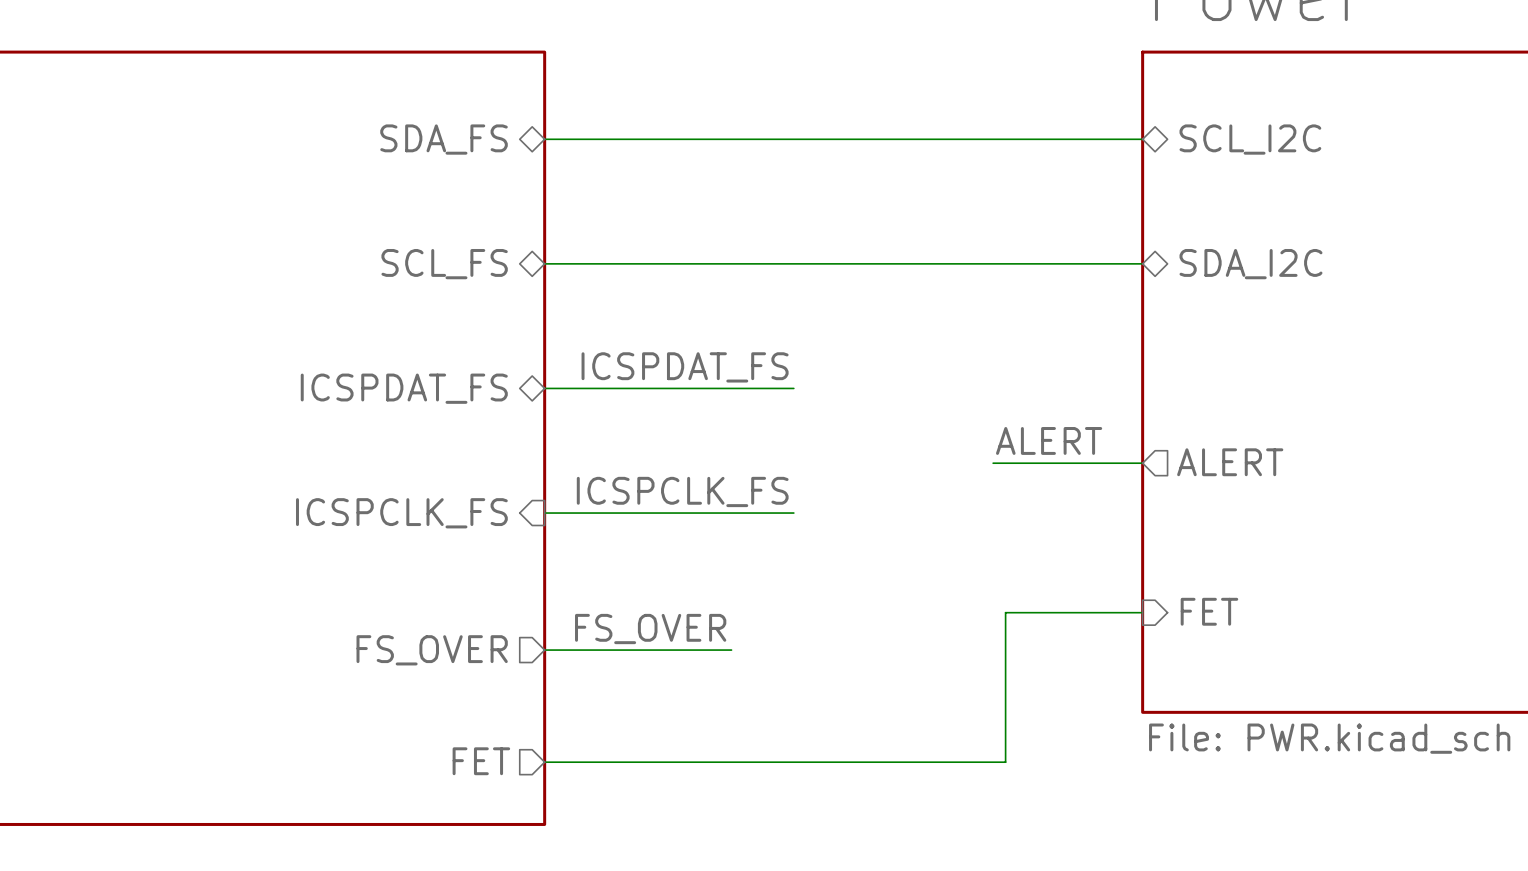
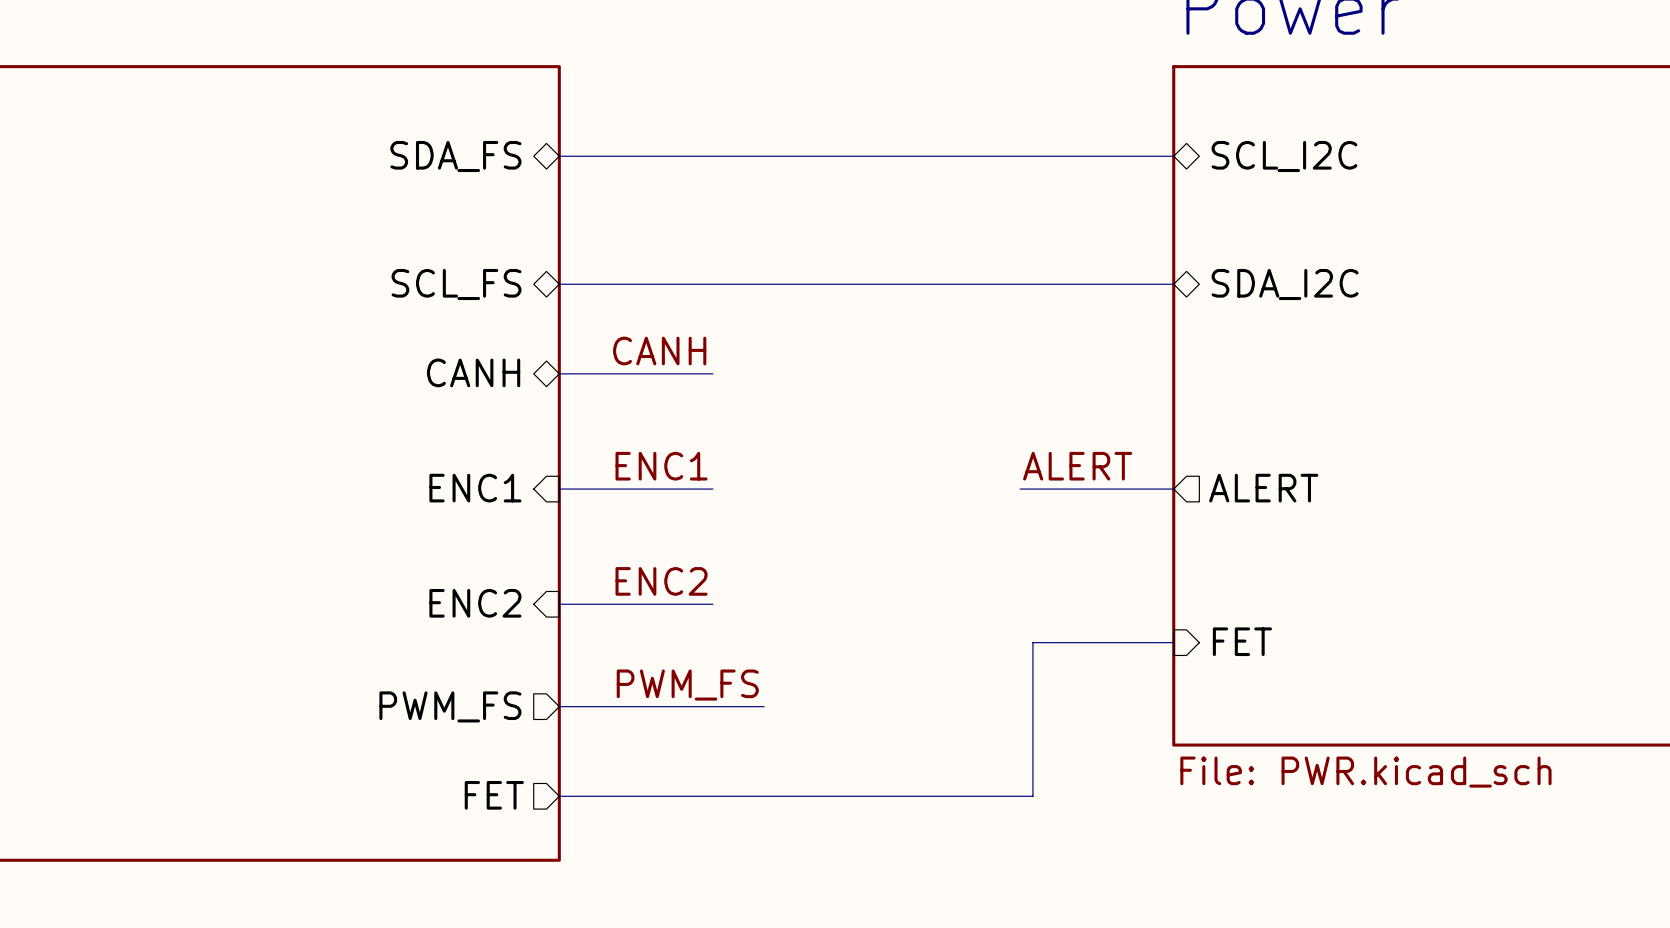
label: none -> CANH (659, 351)
sheet pin: none -> CANH (473, 372)
wire: none -> (559, 373) (712, 373)
label: ICSPDAT_FS (685, 367) -> none
sheet pin: ICSPDAT_FS (404, 388) -> none
wire: (544, 388) (793, 388) -> none
label: none -> ENC1 (661, 466)
sheet pin: none -> ENC1 (475, 488)
wire: none -> (559, 489) (712, 489)
label: ICSPCLK_FS (682, 491) -> none
sheet pin: ICSPCLK_FS (401, 513) -> none
wire: (544, 513) (793, 513) -> none
label: none -> ENC2 (661, 581)
sheet pin: none -> ENC2 (475, 603)
wire: none -> (559, 604) (712, 604)
label: FS_OVER (650, 629) -> none
sheet pin: FS_OVER (432, 650) -> none
wire: (544, 650) (731, 650) -> none
label: none -> PWM_FS (687, 685)
wire: none -> (559, 706) (764, 706)
sheet pin: none -> PWM_FS (450, 706)

